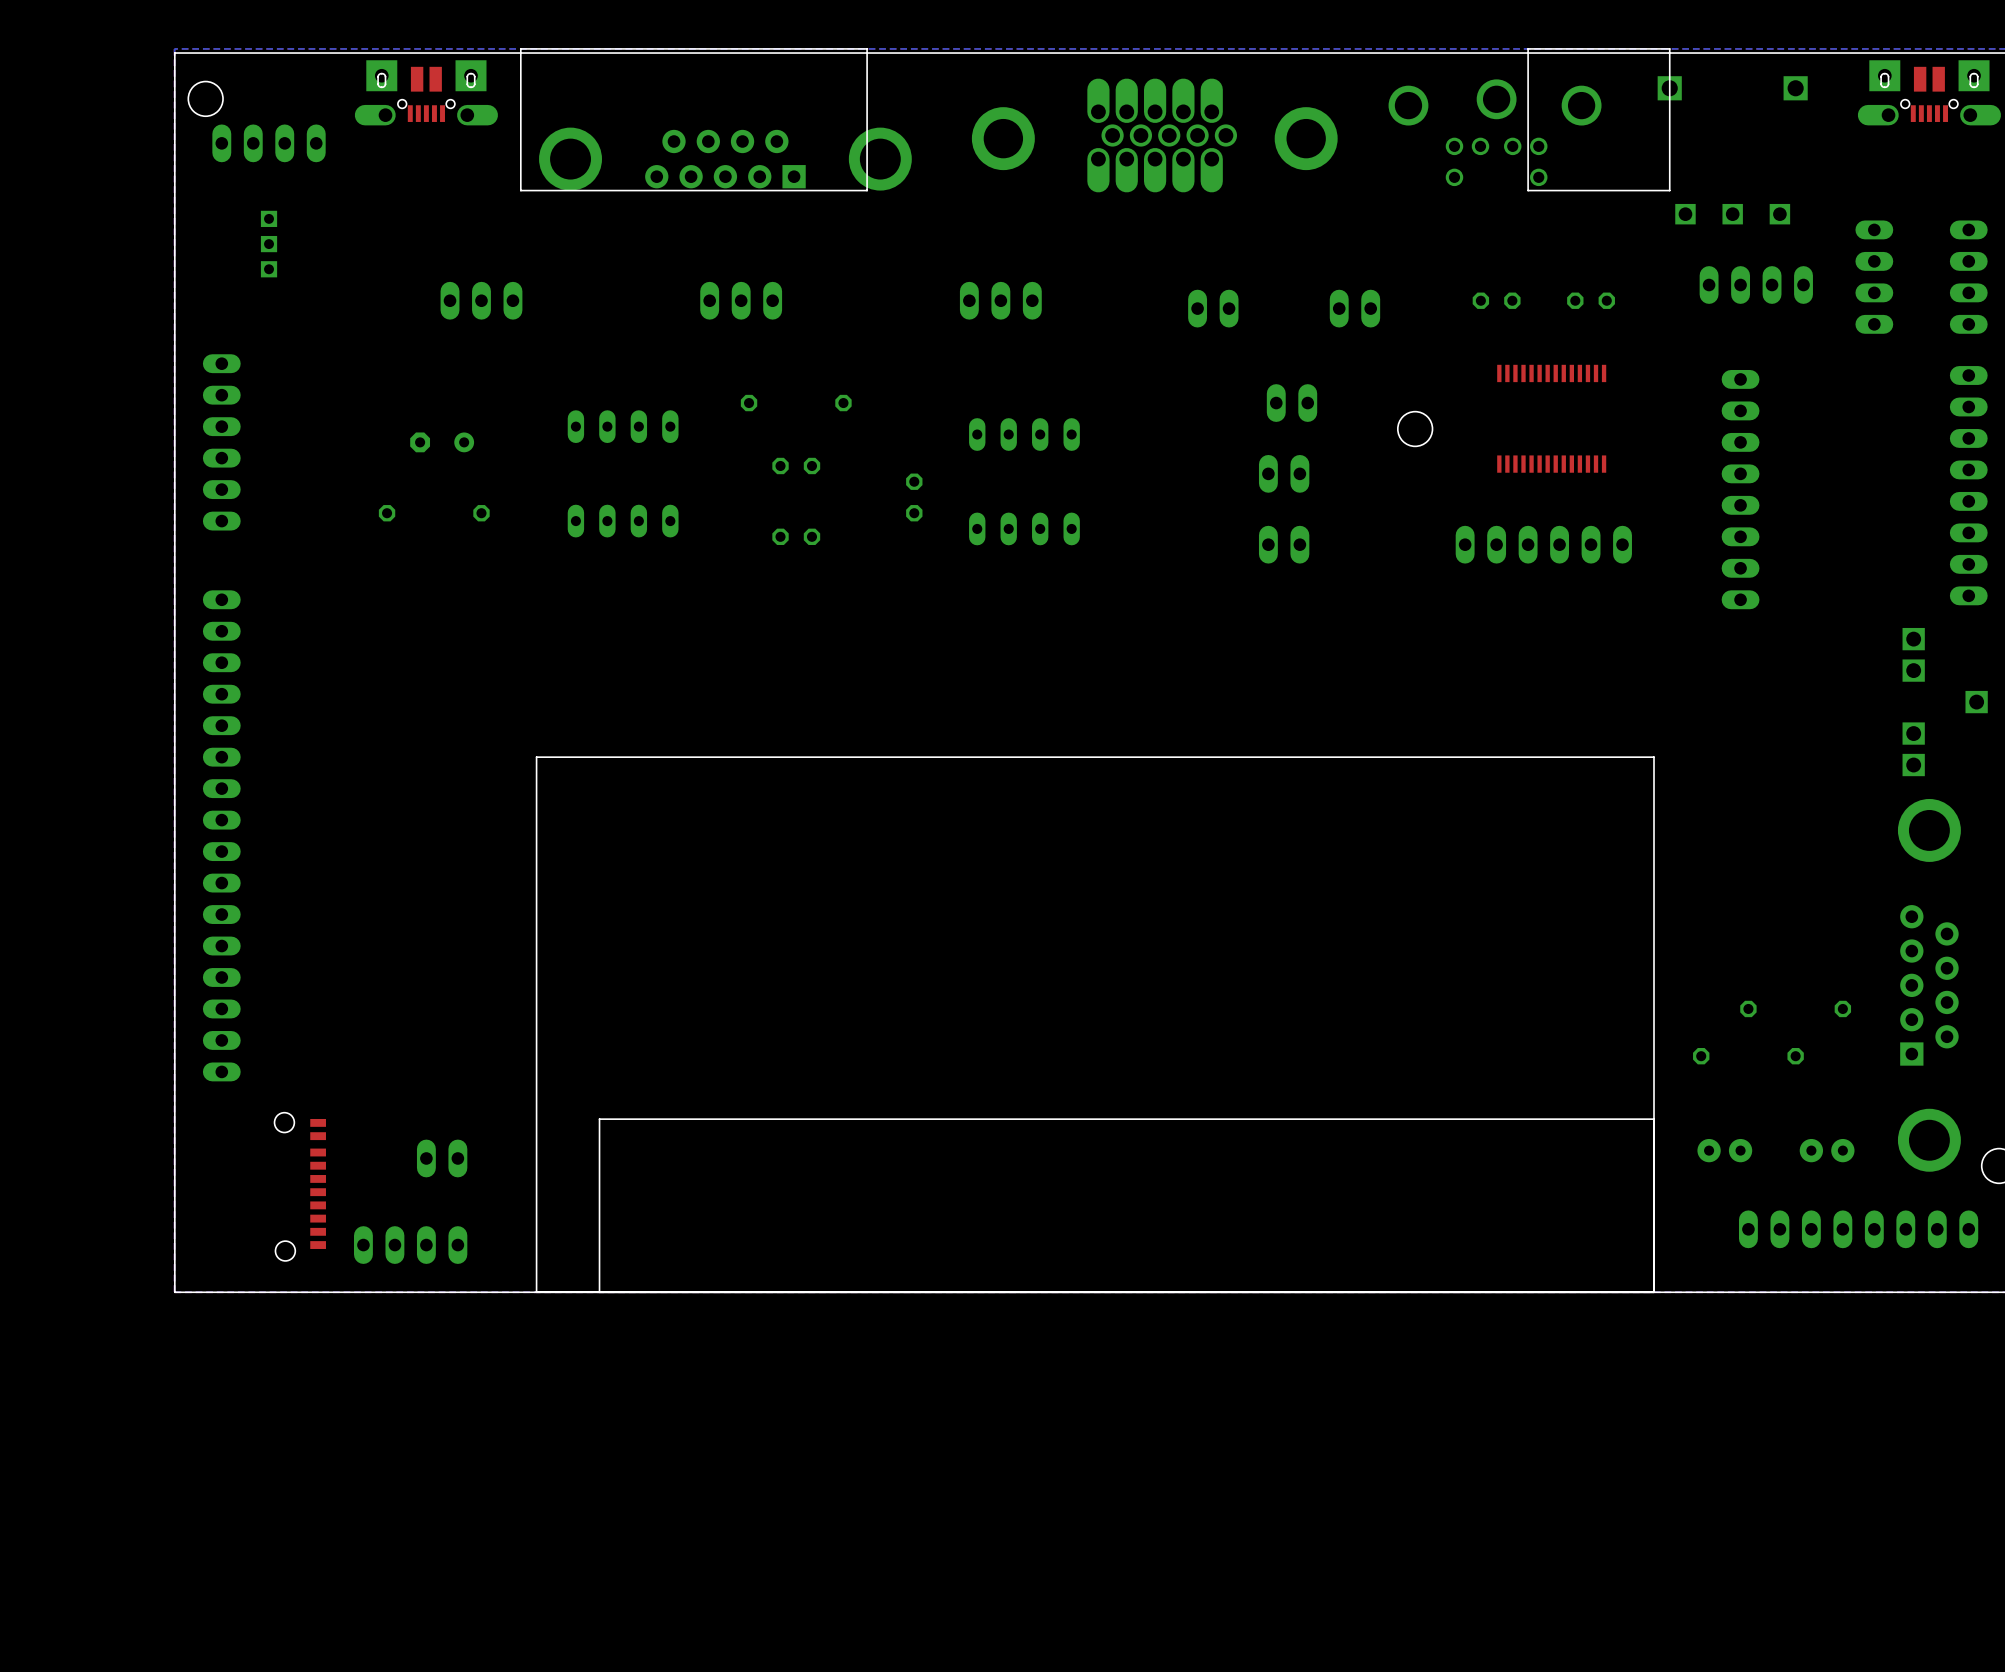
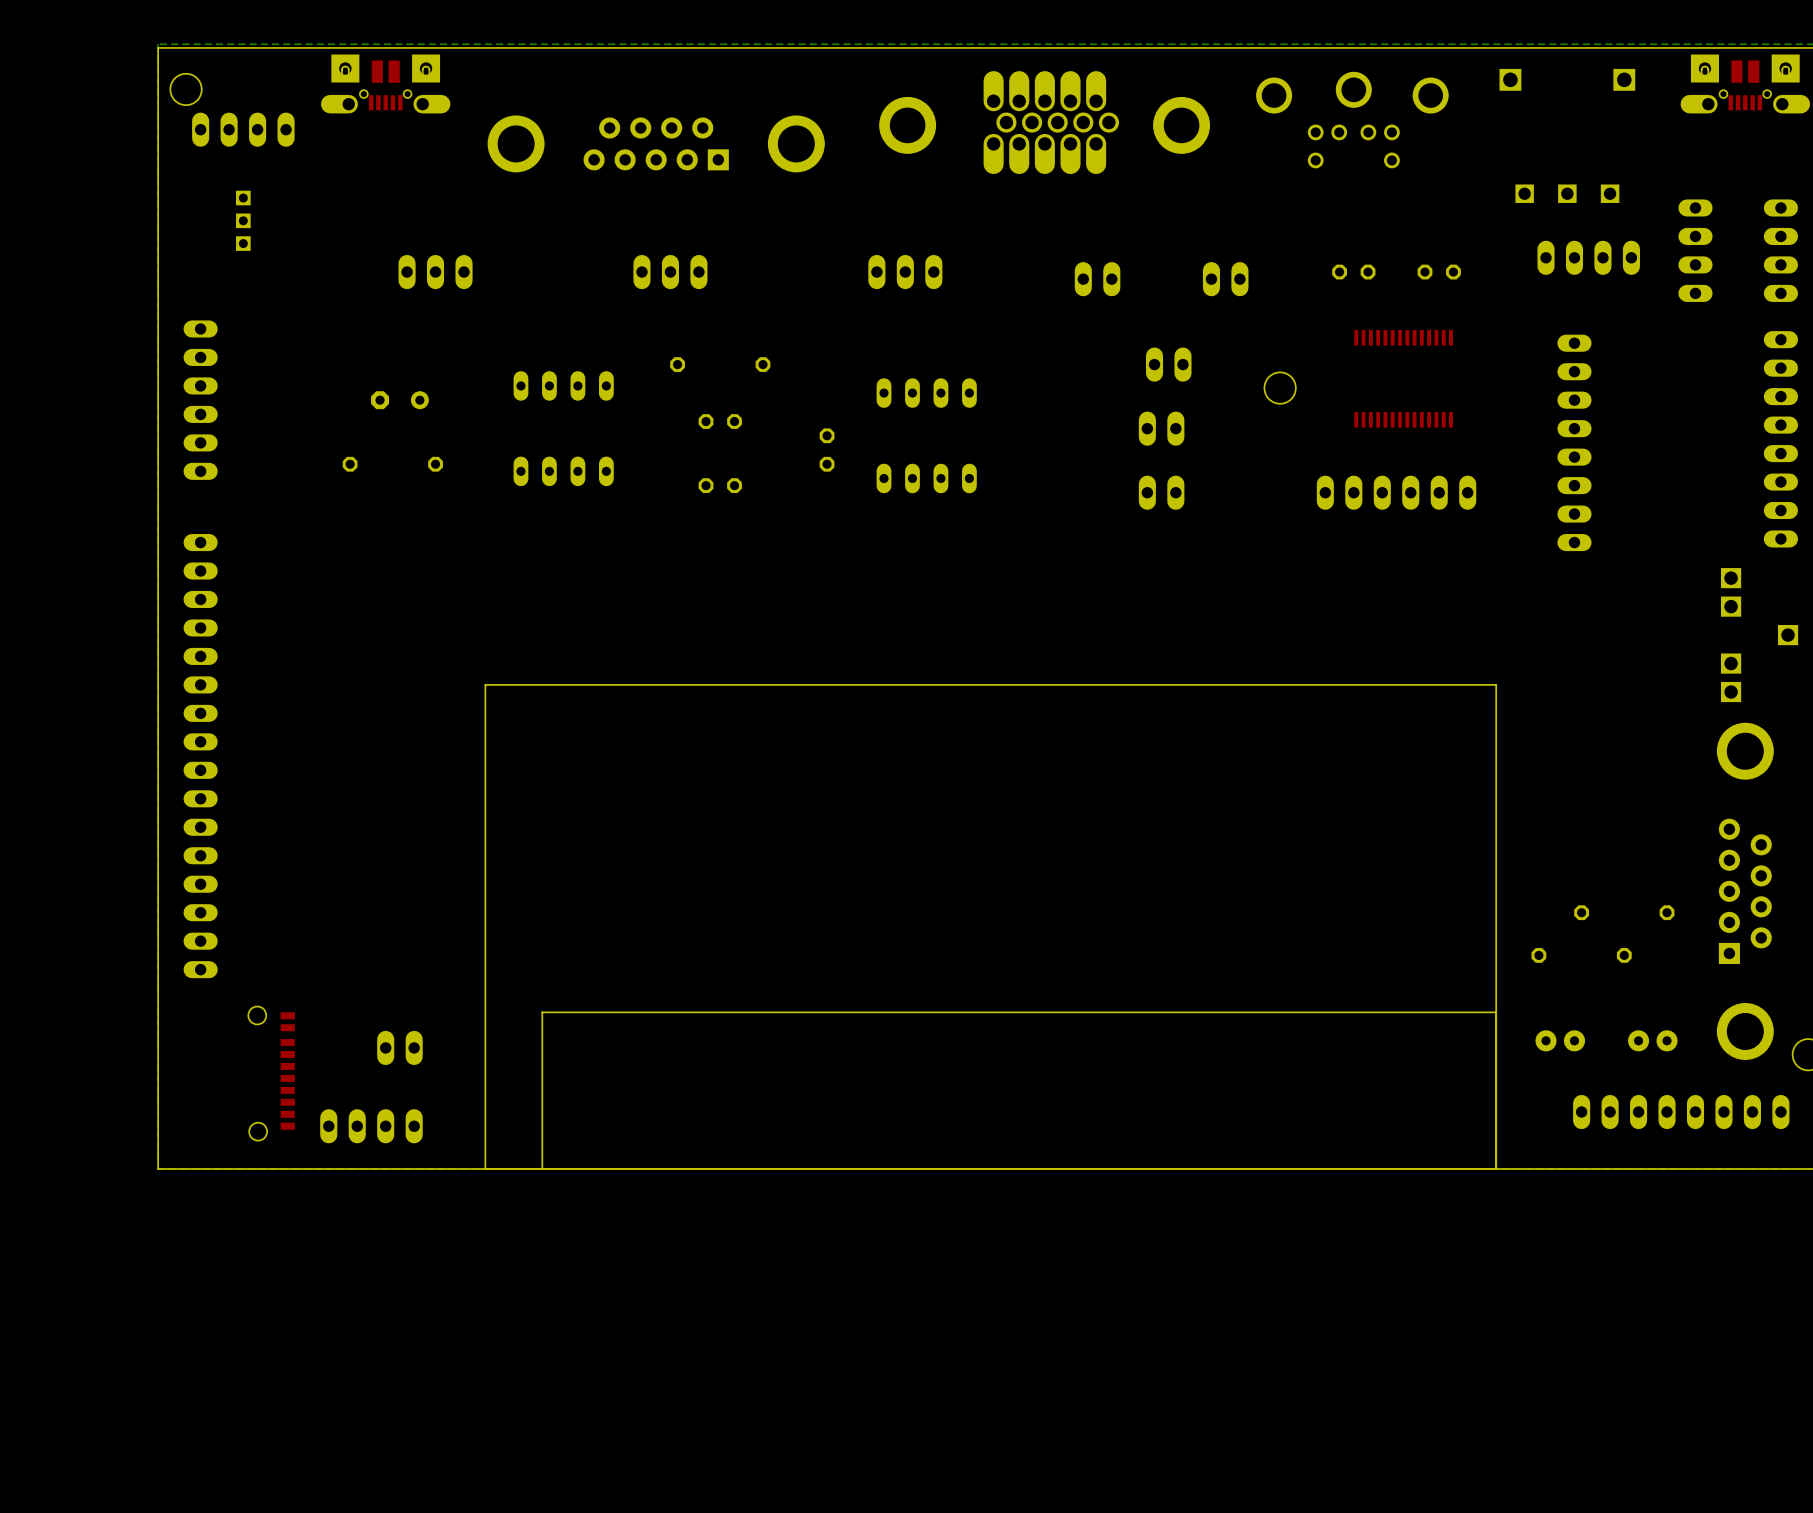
board edge: (867, 48) (520, 48) (520, 190) (867, 190) (867, 48) -> none
board edge: (1669, 48) (1528, 48) (1528, 190) (1669, 190) (1669, 48) -> none

